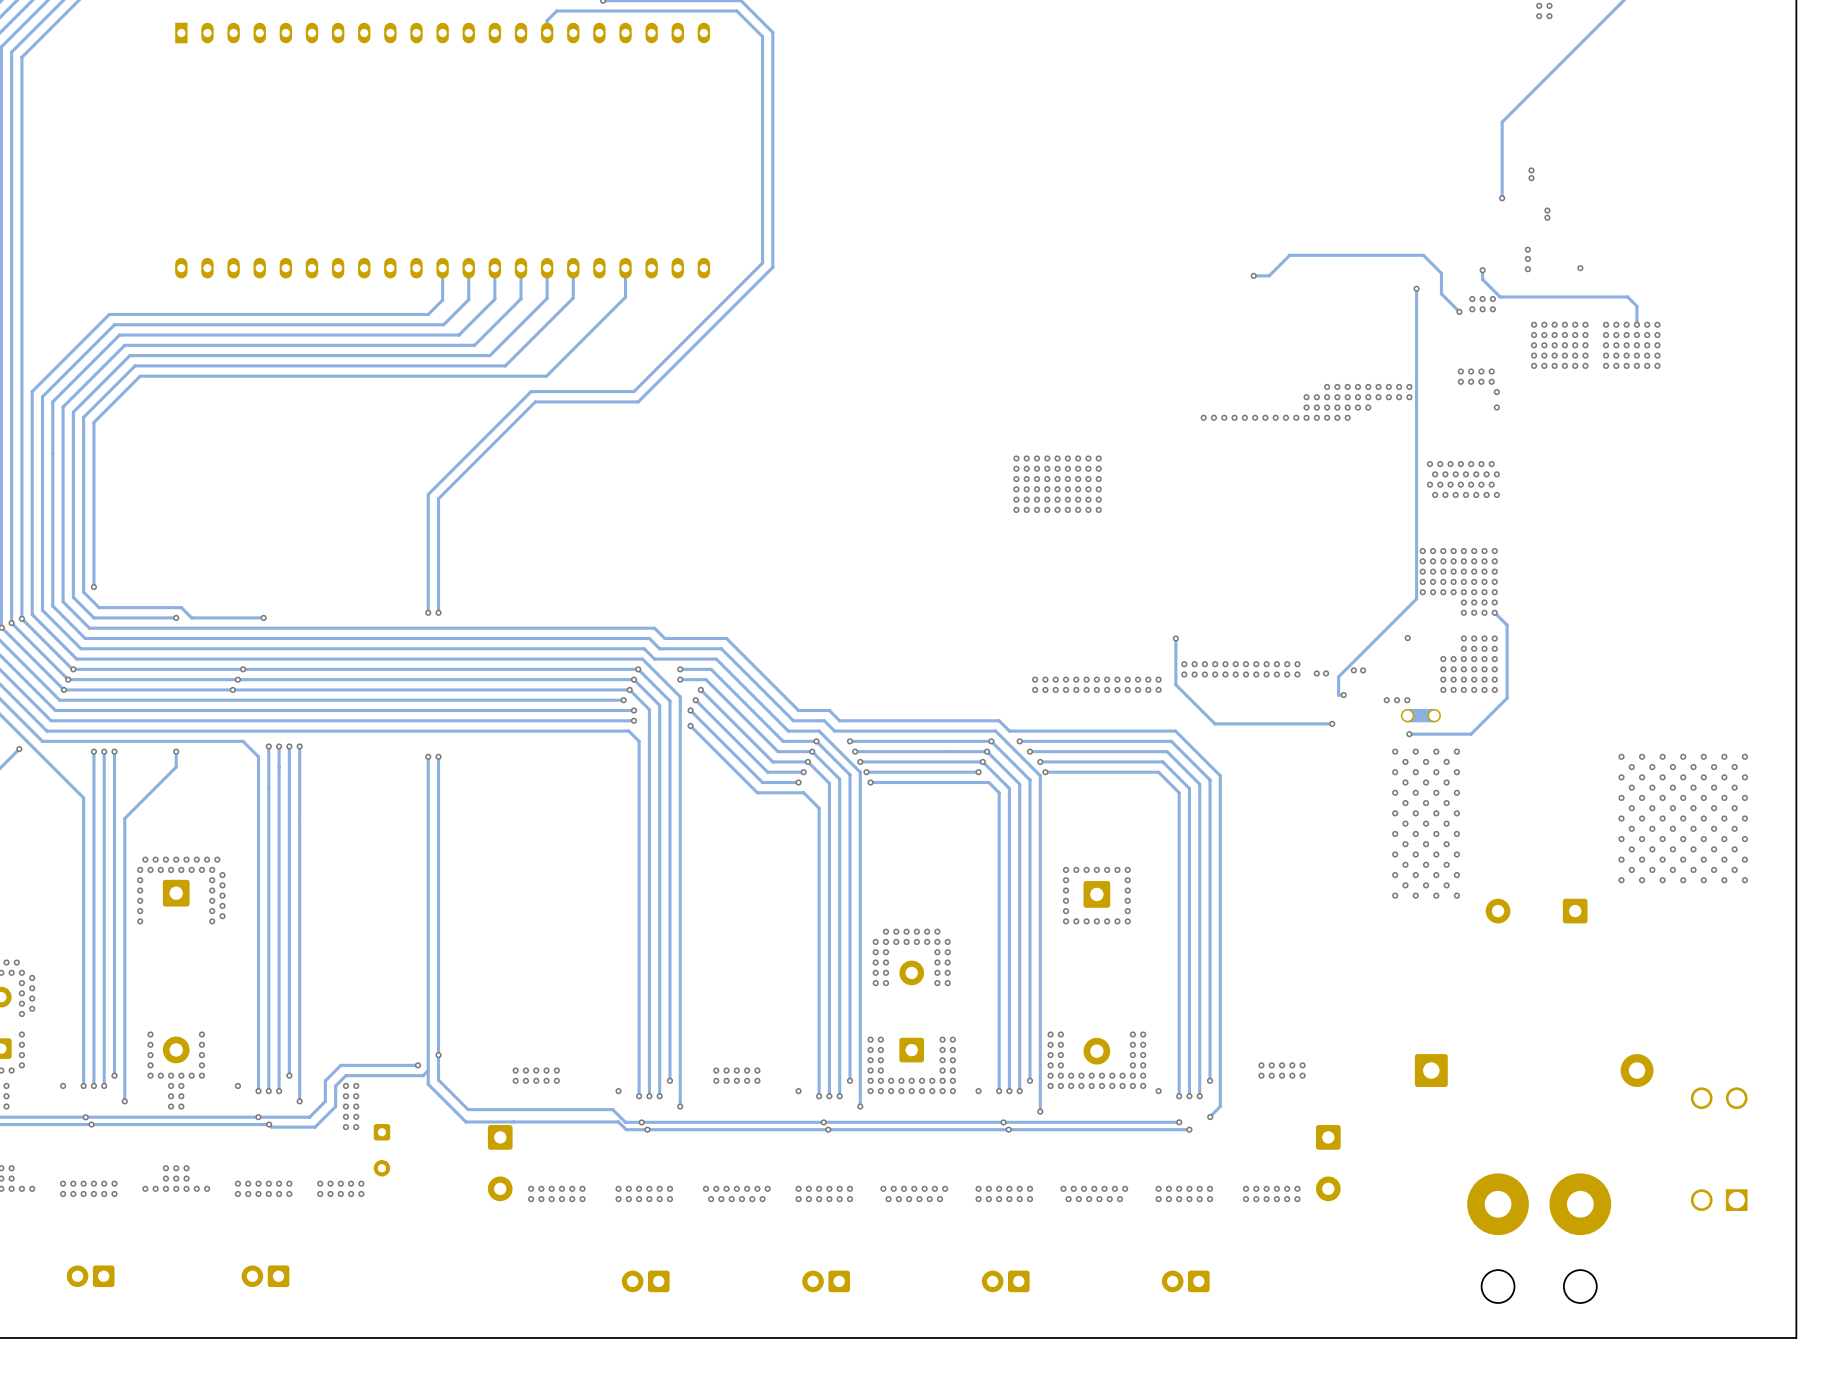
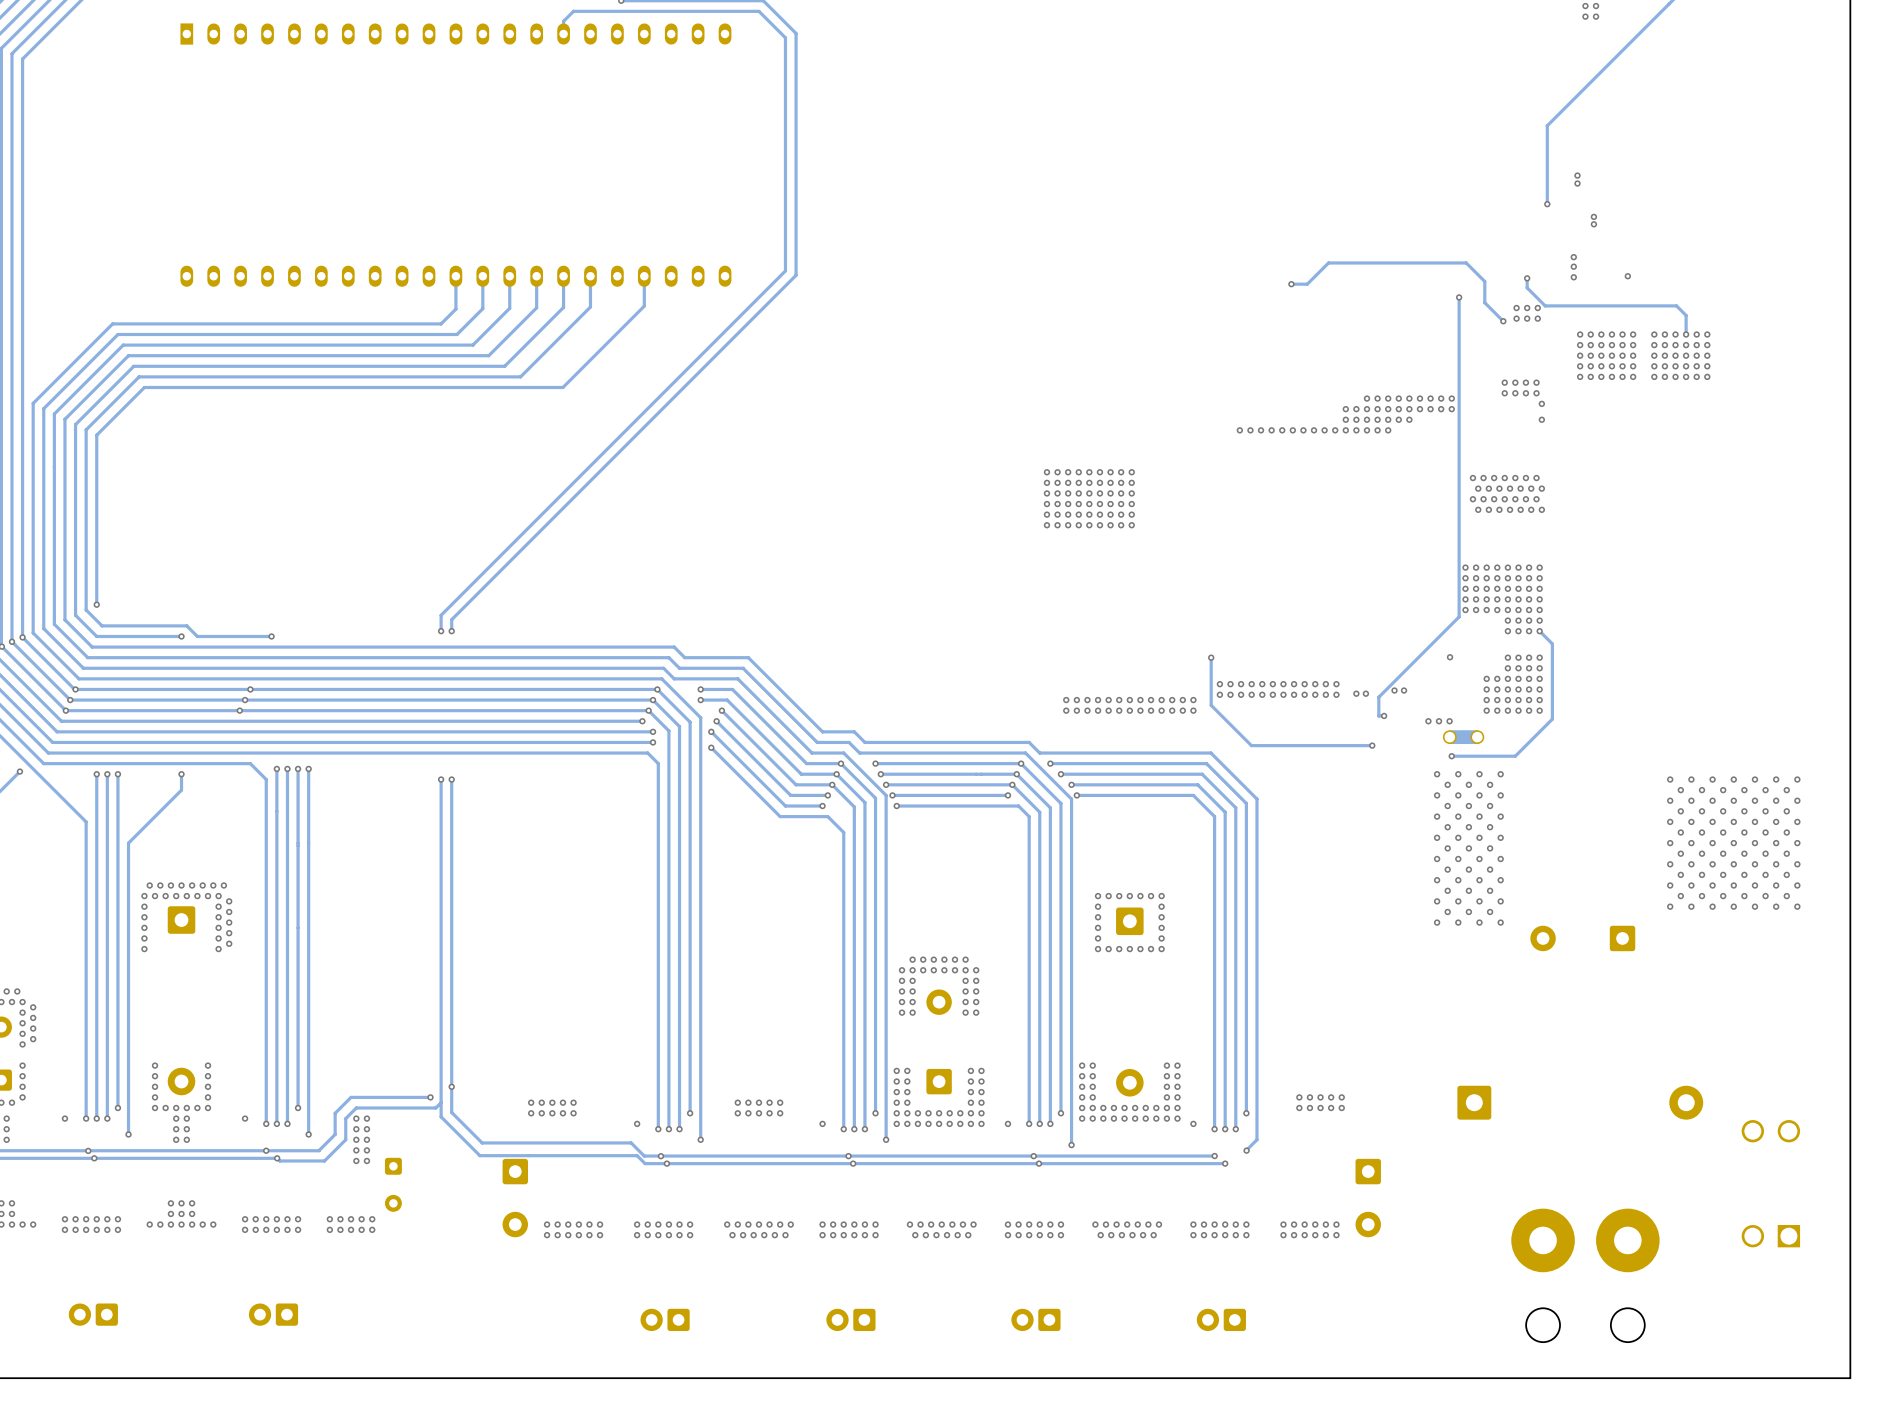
track: (633, 391) (531, 391) (428, 494) (428, 597) -> (653, 403) (441, 615)
track: (638, 401) (535, 401) (438, 498) (438, 601) -> (657, 413) (451, 619)

